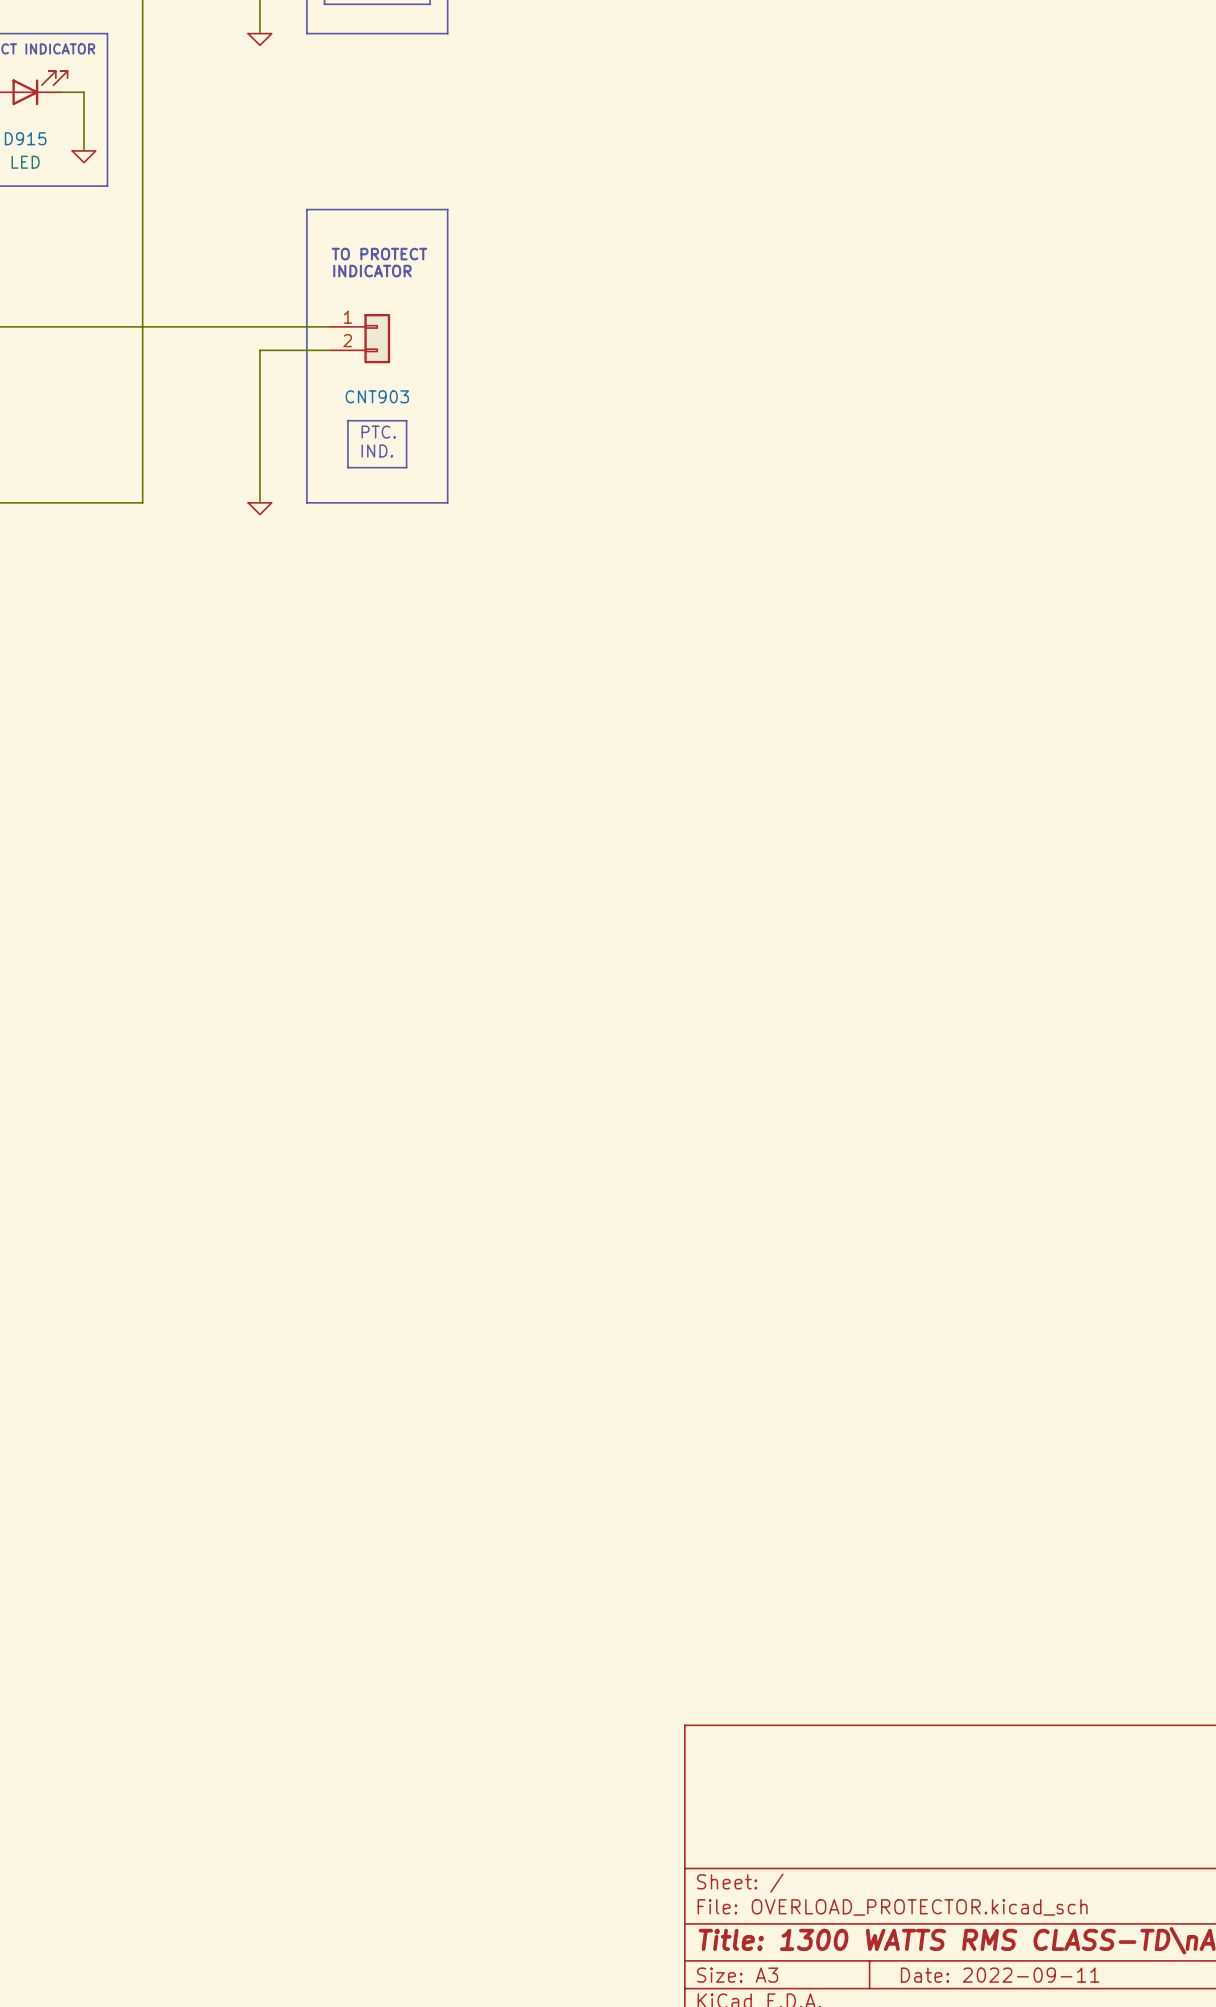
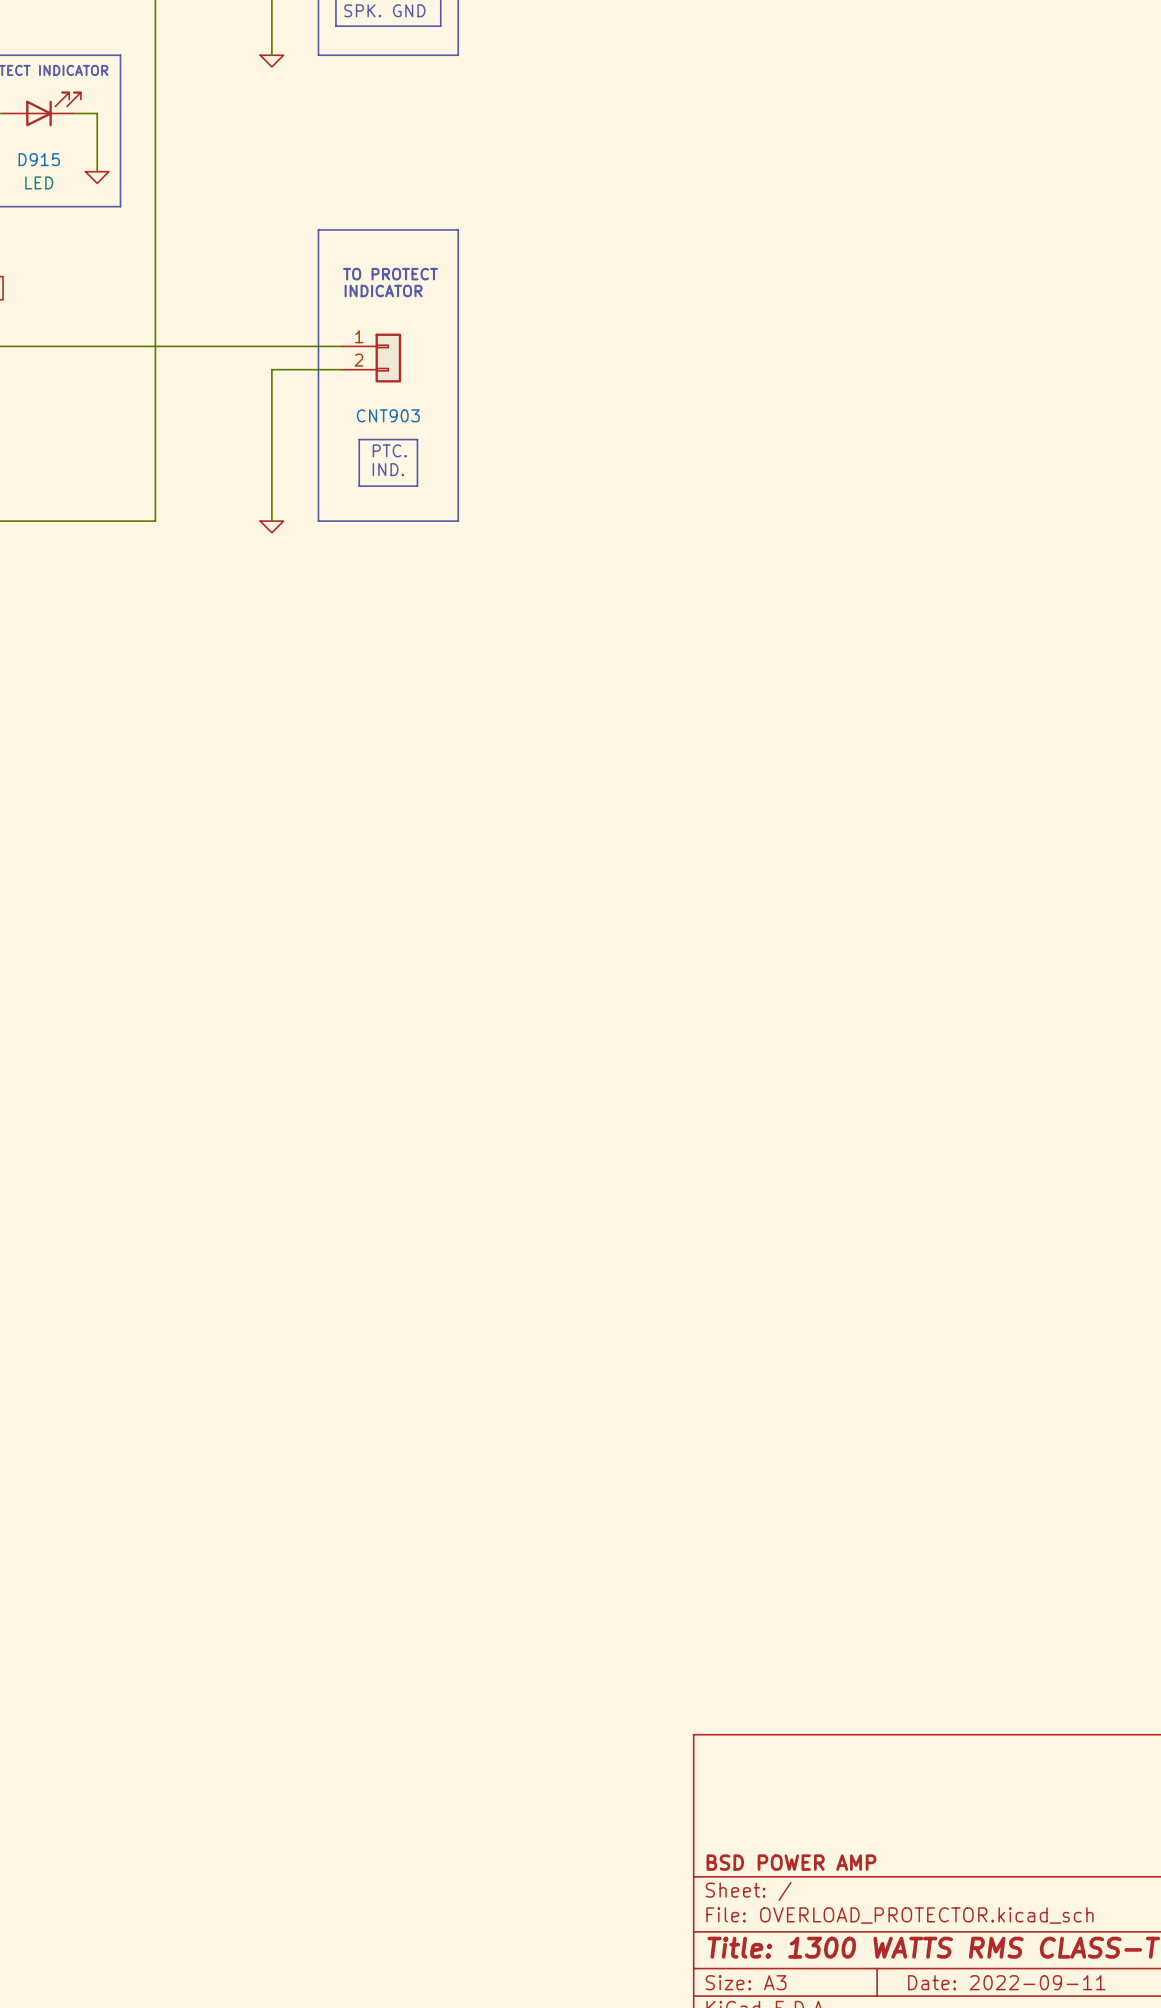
title block: none -> BSD POWER AMP (791, 1862)

